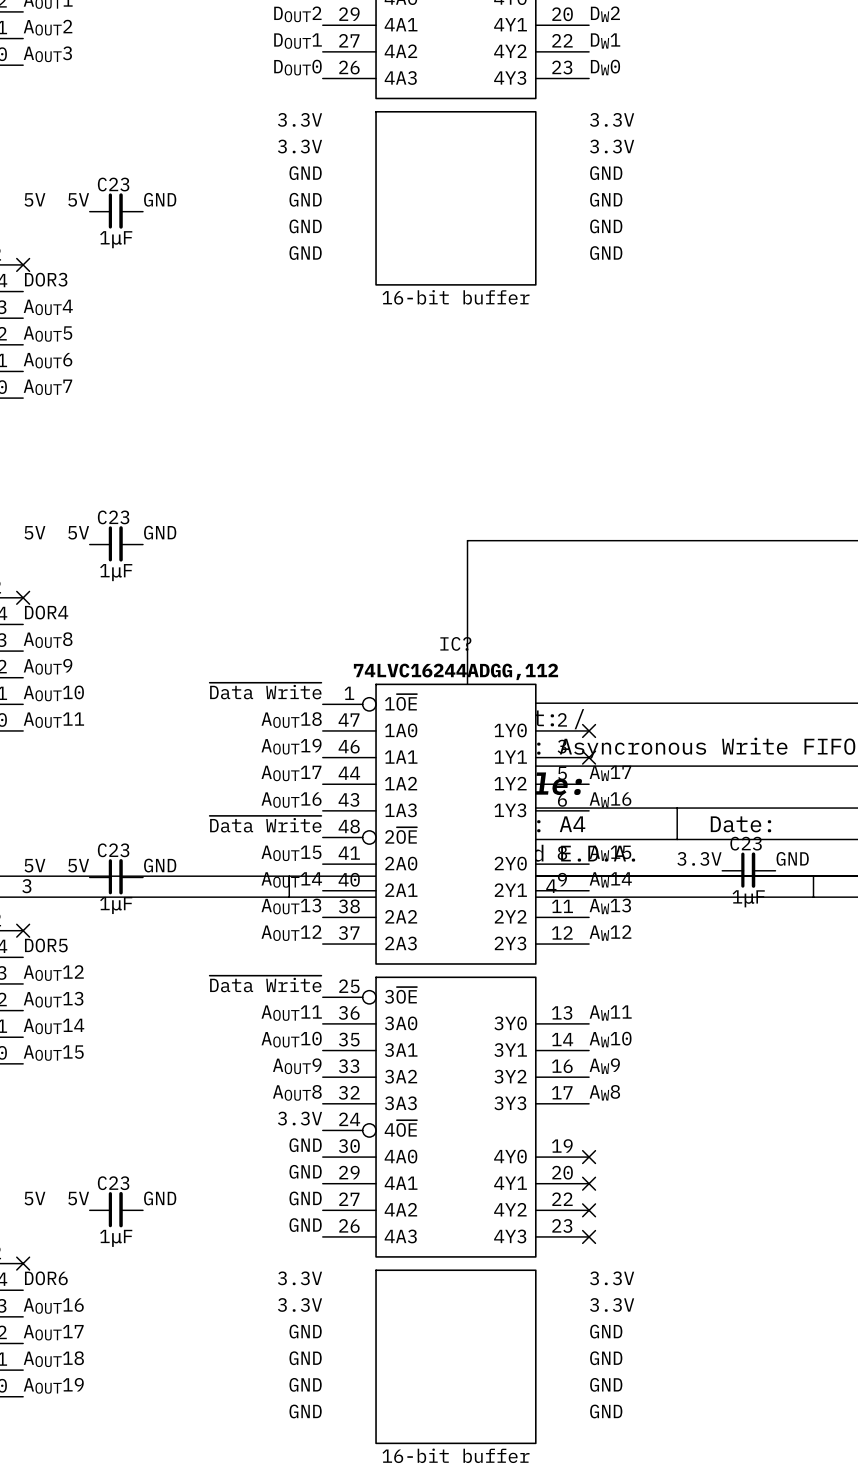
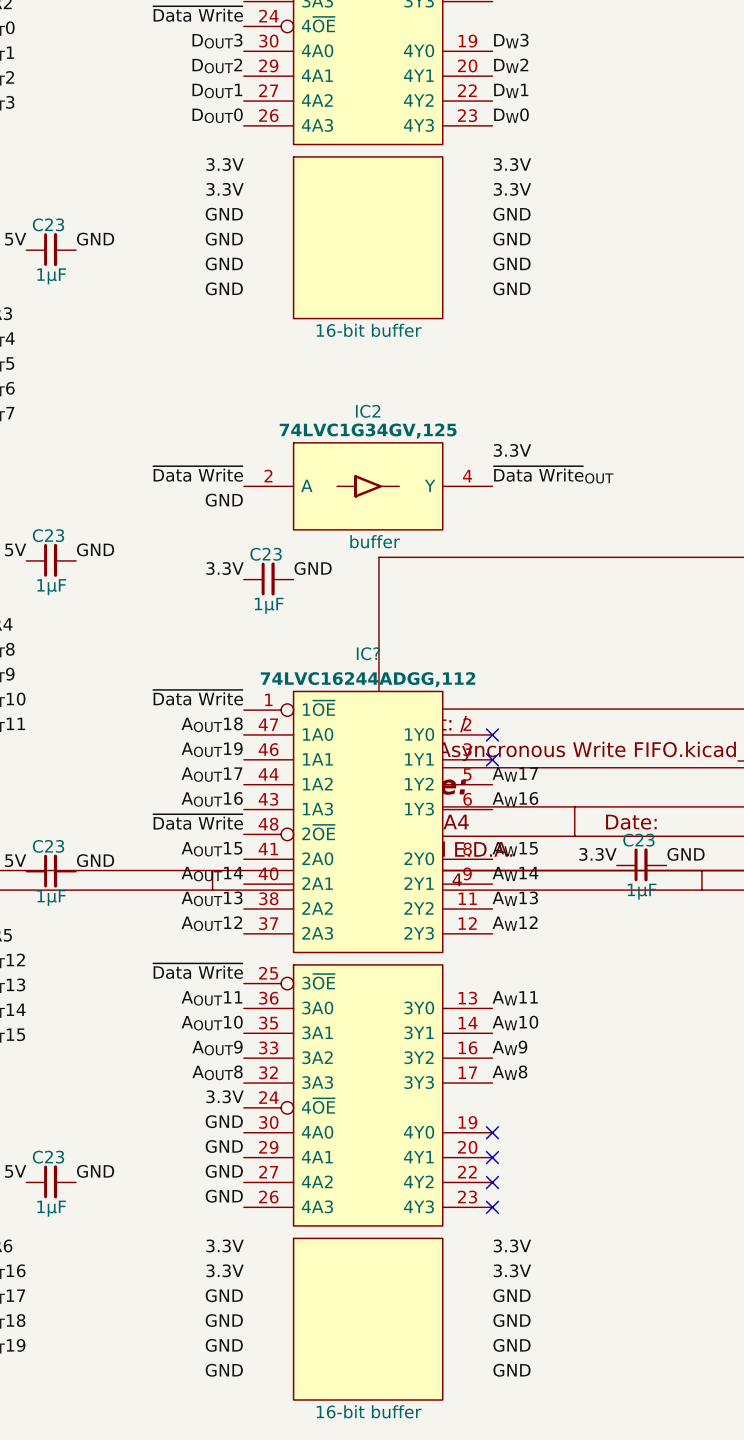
label: none -> 3.3V (512, 450)
label: none -> ~{Data Write} (198, 473)
label: none -> ~{Data Write}OUT (553, 474)
IC2: none -> 74LVC1G34GV,125 (368, 486)
label: none -> GND (224, 500)
label: none -> 3.3V (225, 568)
label: none -> GND (313, 568)
C23: none -> 1μF (268, 578)

